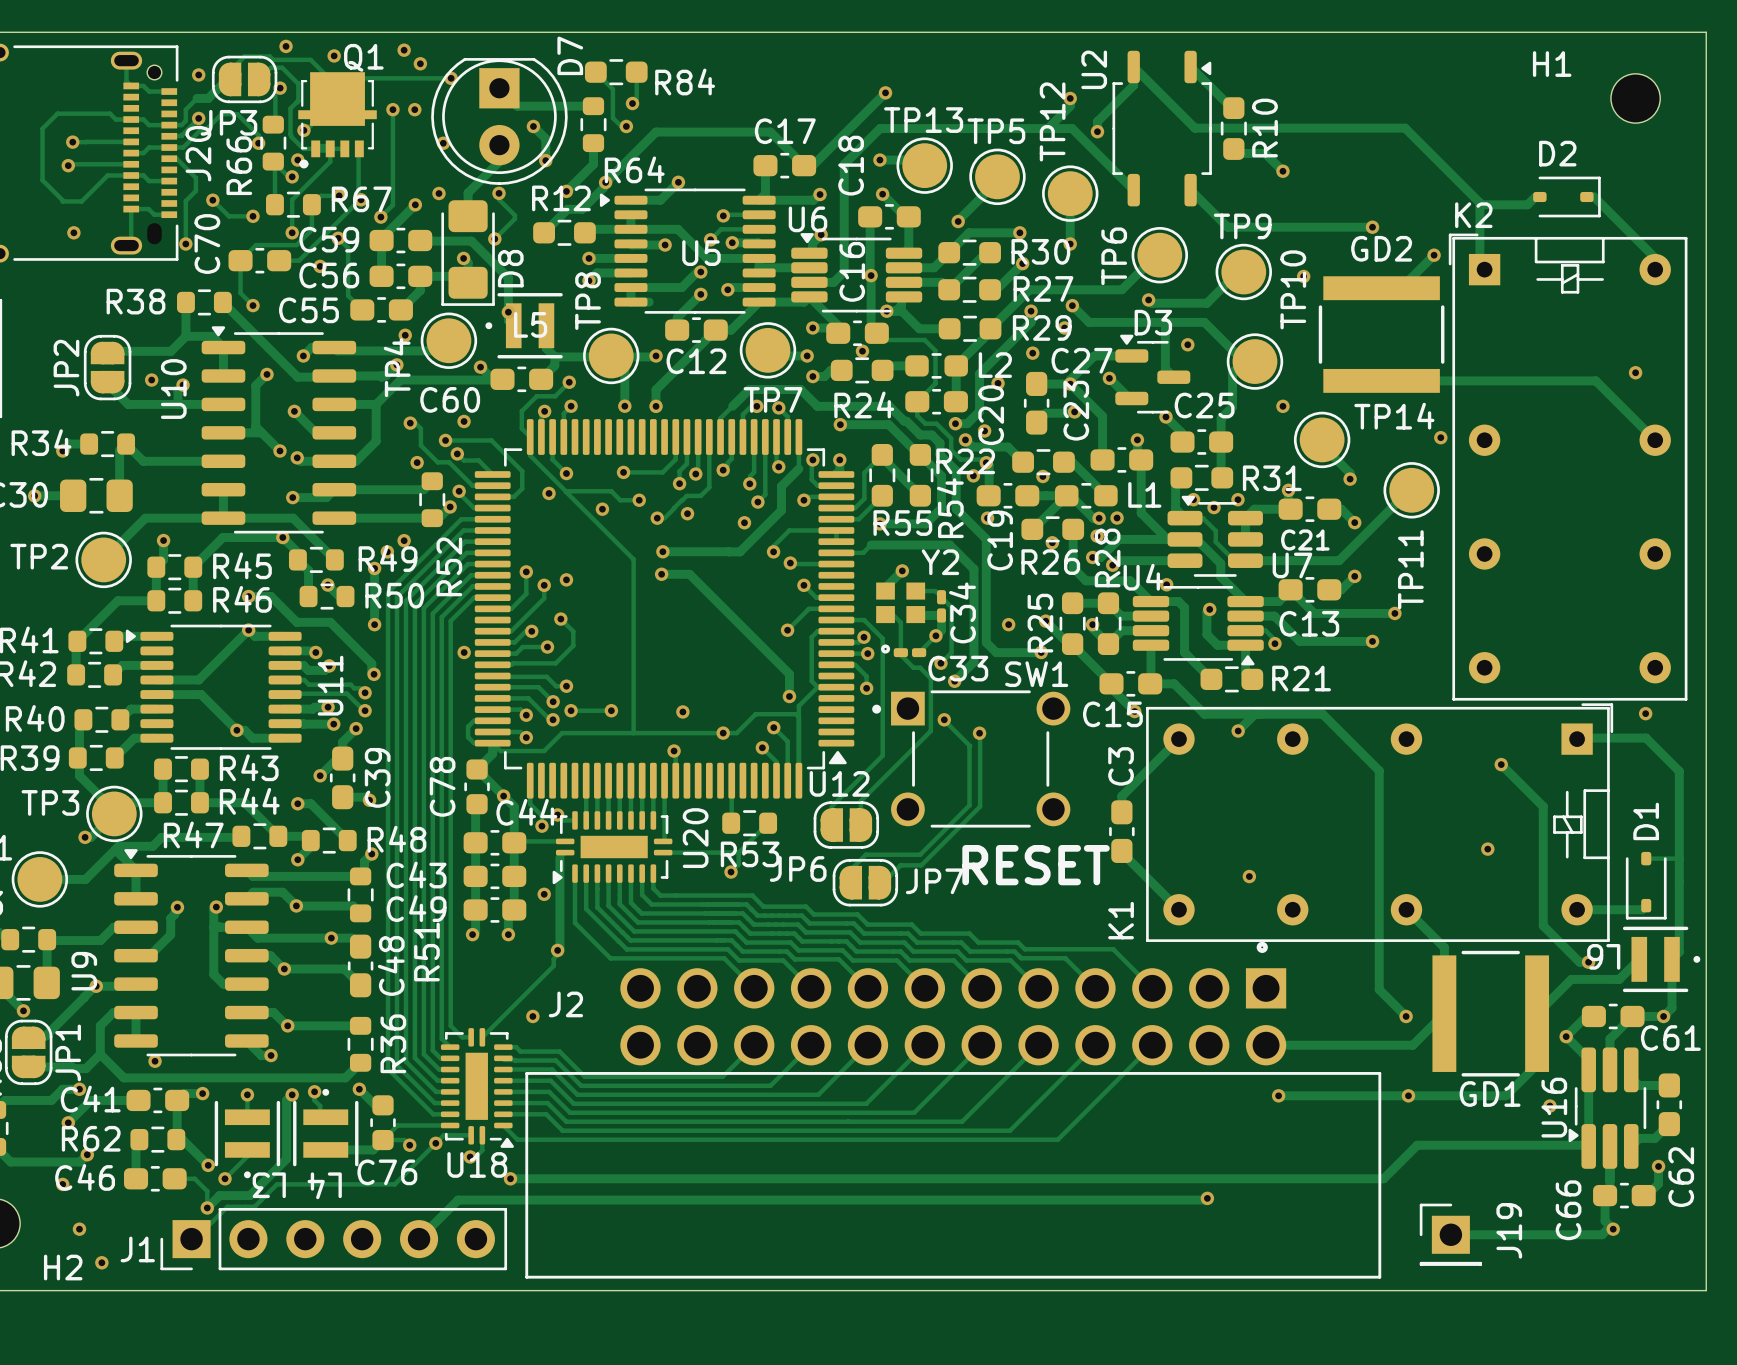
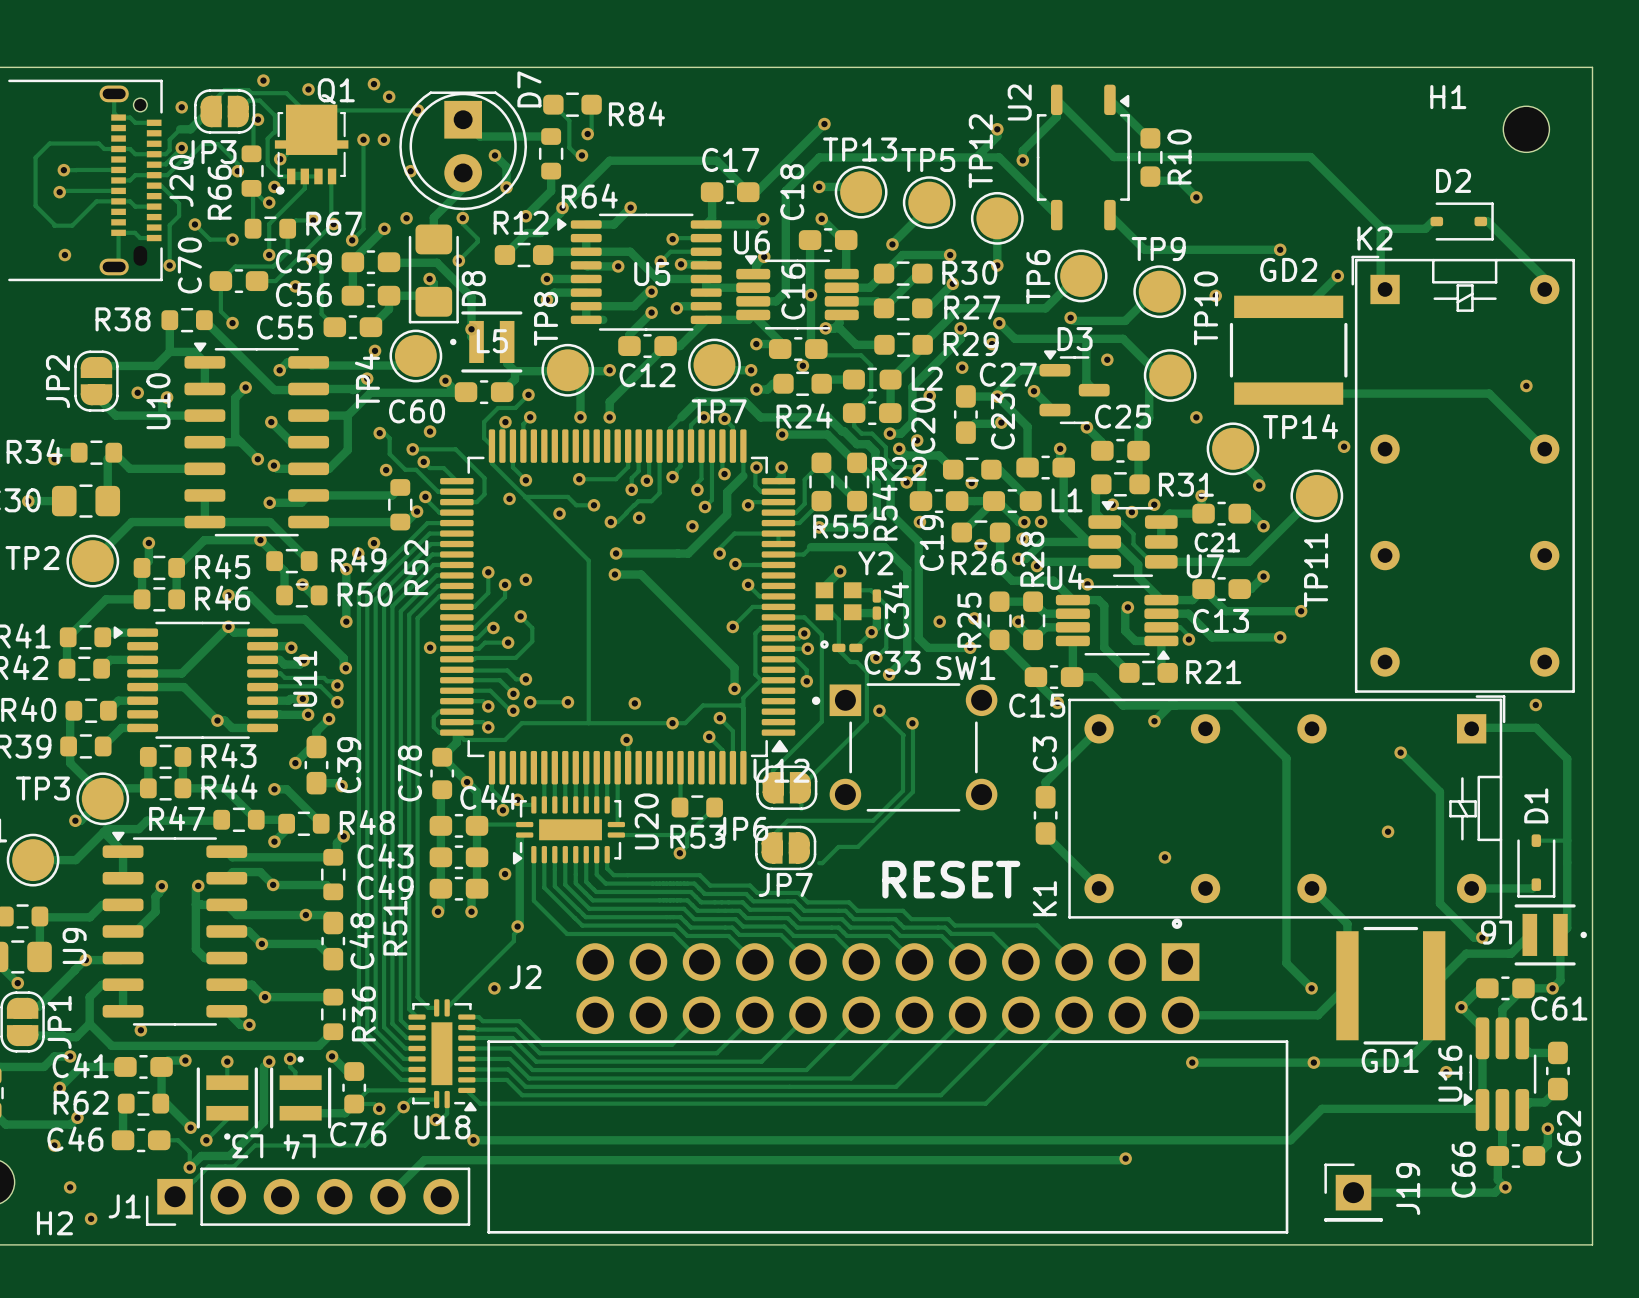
track: (882, 731) (882, 755) (831, 806) (831, 825) -> (821, 721) (773, 770) (773, 787)
JP6 position: (846, 825) -> (786, 787)
track: (937, 837) (920, 854) (865, 854) (850, 869) (850, 882) -> (873, 820) (787, 820) (772, 836) (772, 847)
text position: RESET (1036, 865) -> RESET (951, 879)
JP7 name position: JP7 (934, 881) -> JP7 (785, 884)
JP7 position: (865, 882) -> (785, 847)

